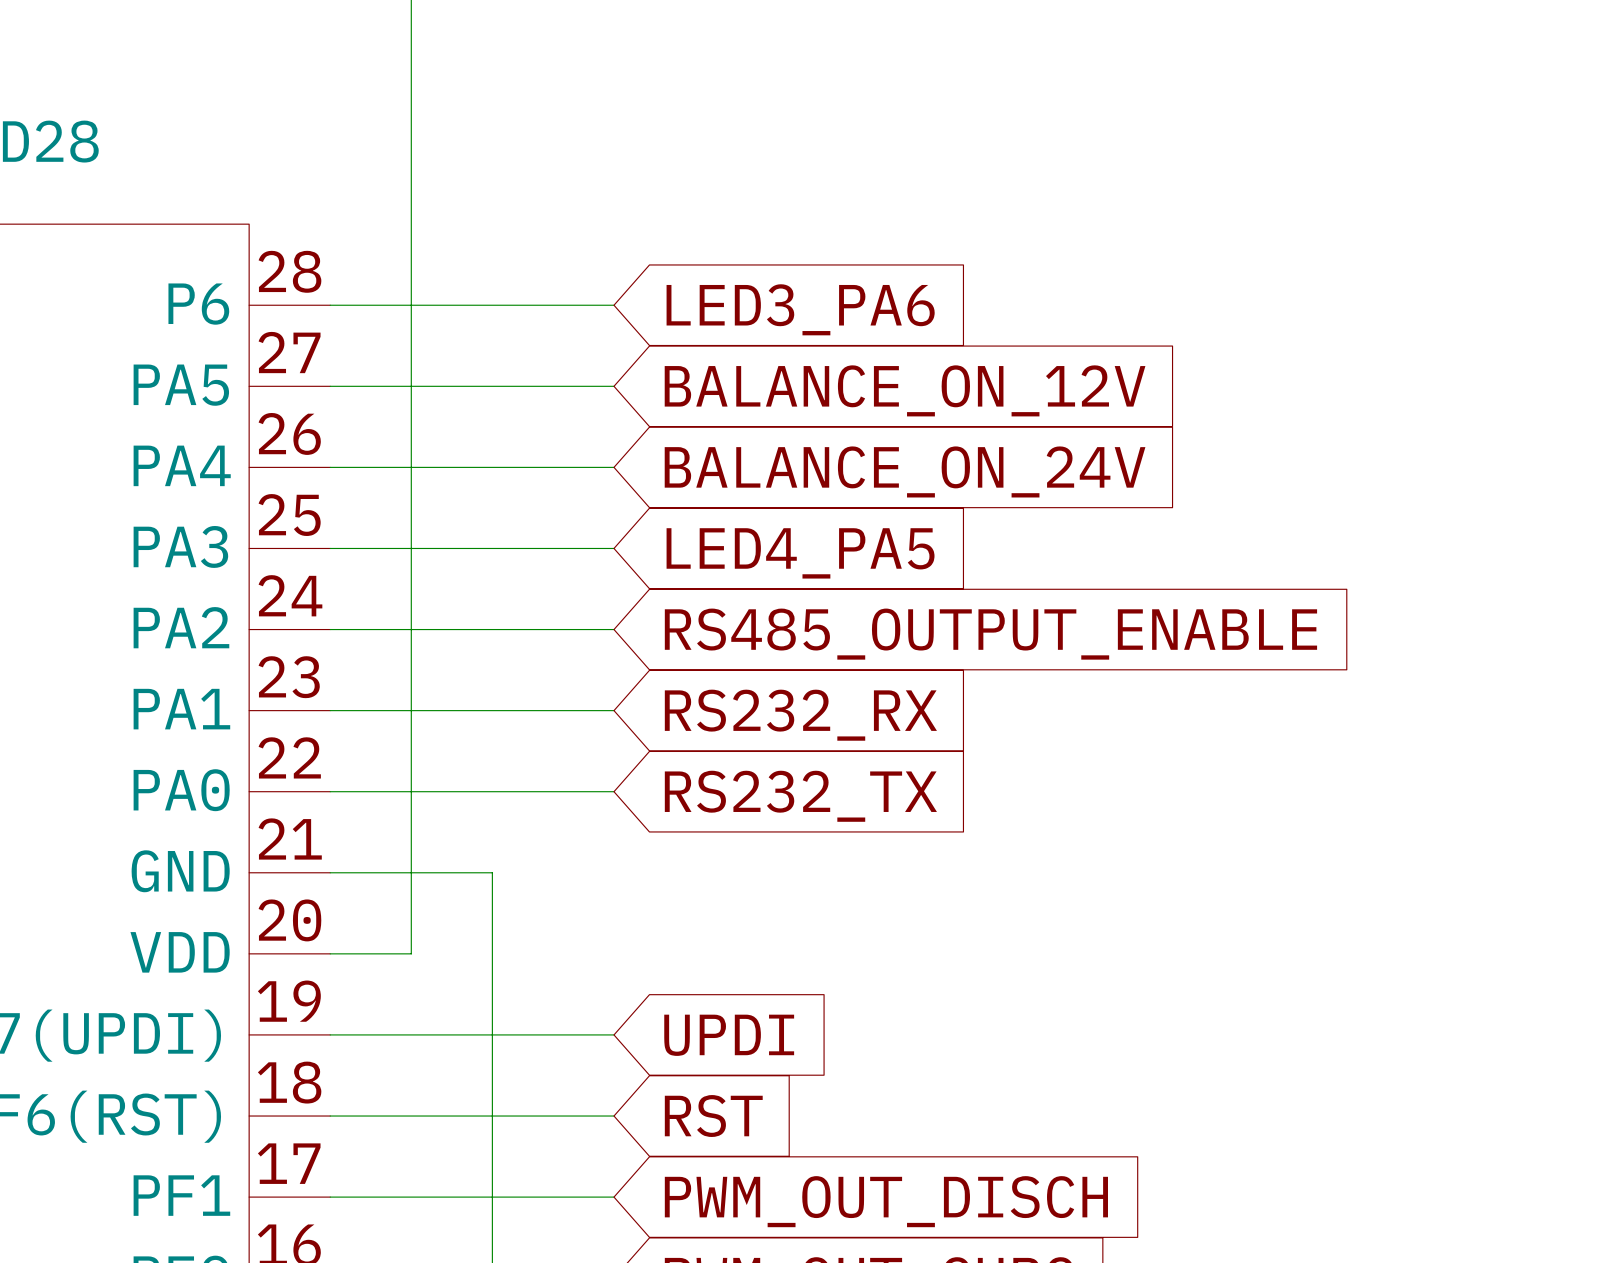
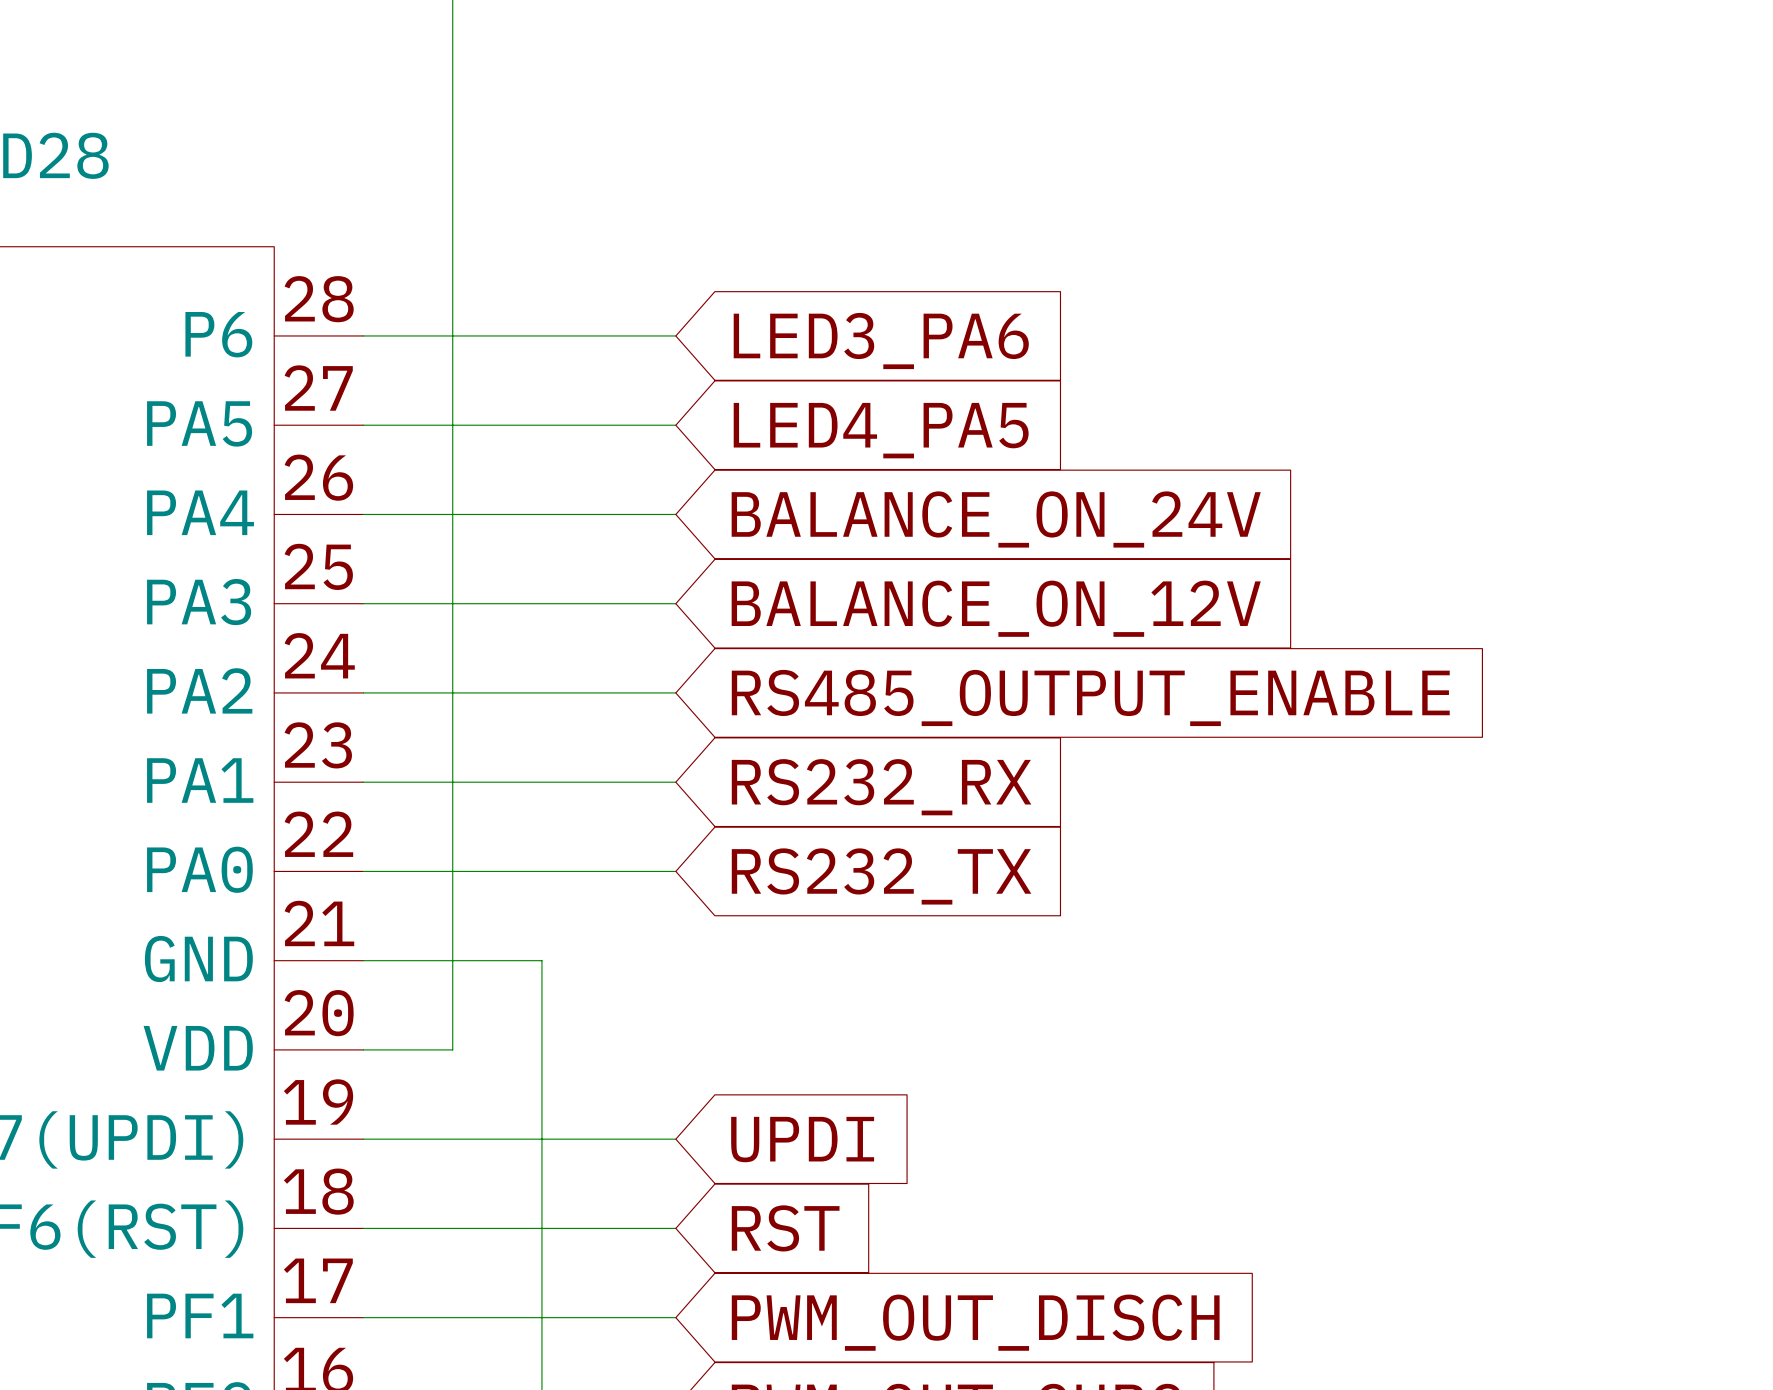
global label: BALANCE_ON_12V (905, 390) -> LED4_PA5 (881, 430)
global label: LED4_PA5 (800, 553) -> BALANCE_ON_12V (996, 608)

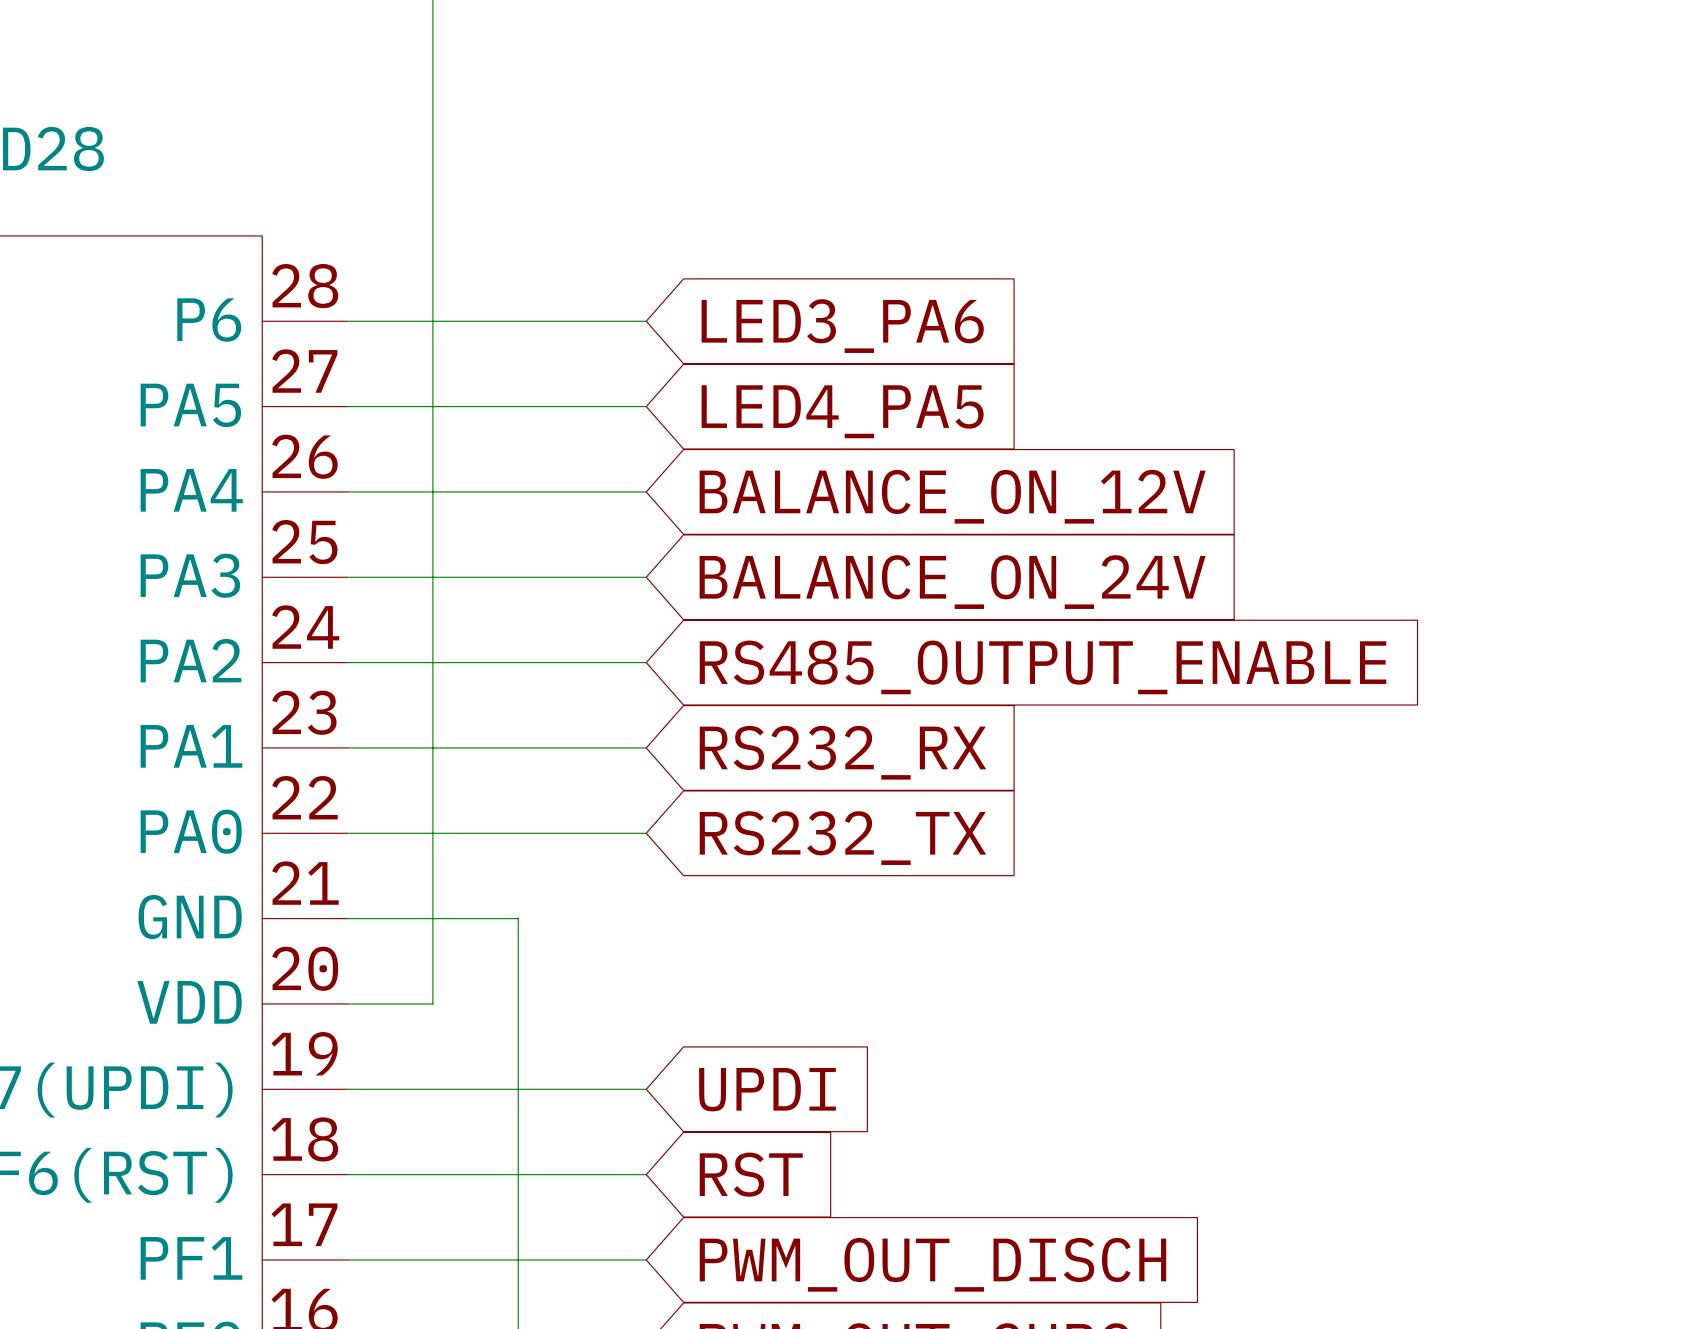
global label: BALANCE_ON_24V (996, 519) -> BALANCE_ON_12V (952, 496)
global label: BALANCE_ON_12V (996, 608) -> BALANCE_ON_24V (952, 582)

